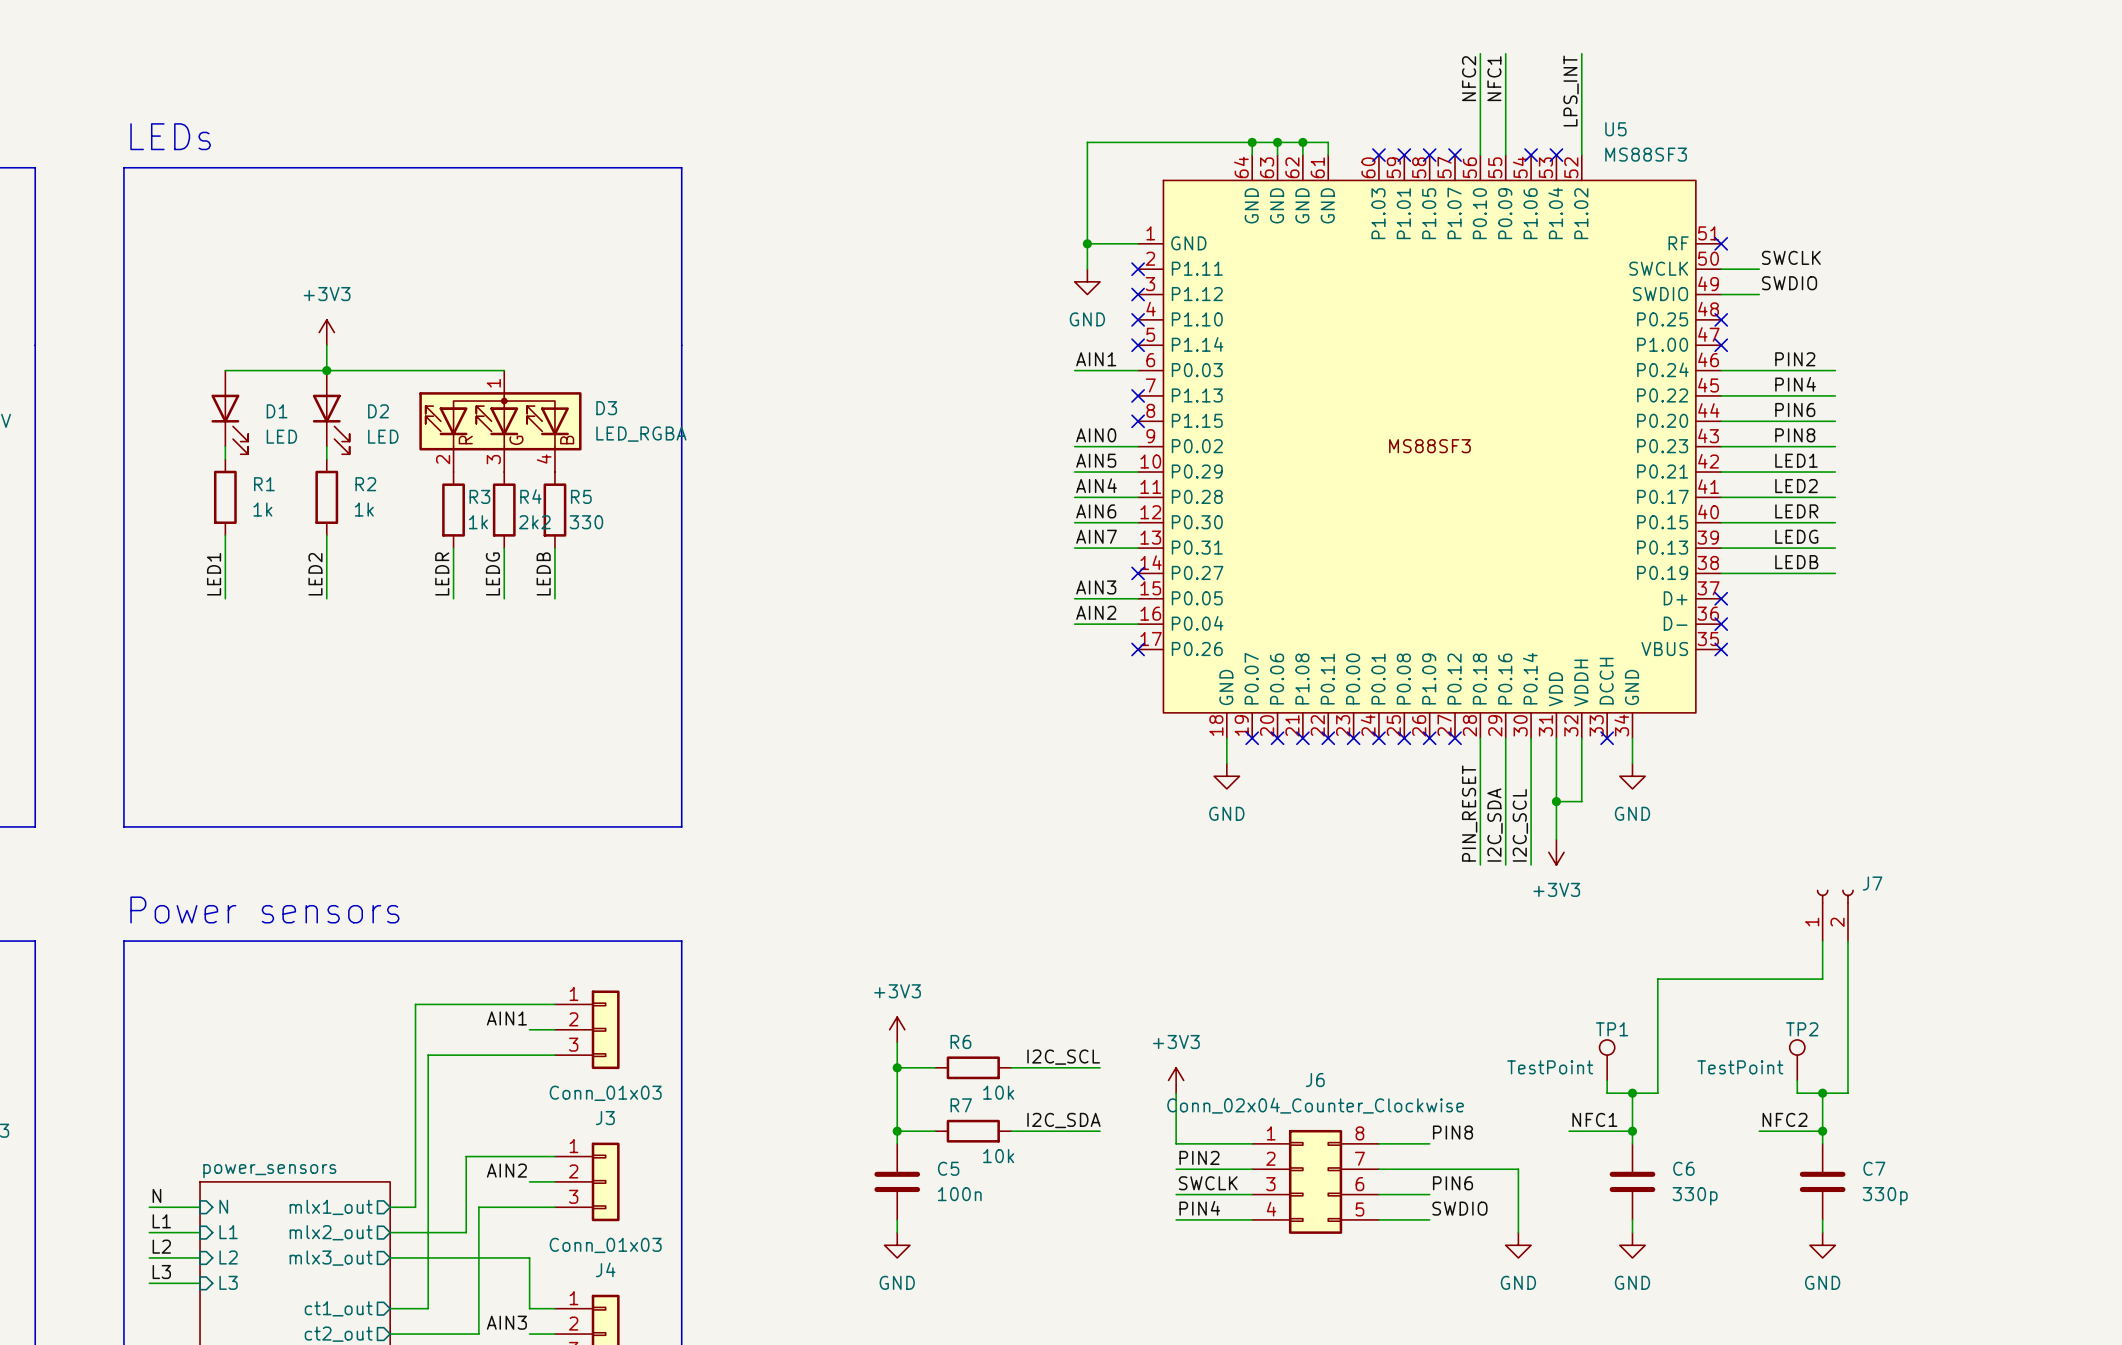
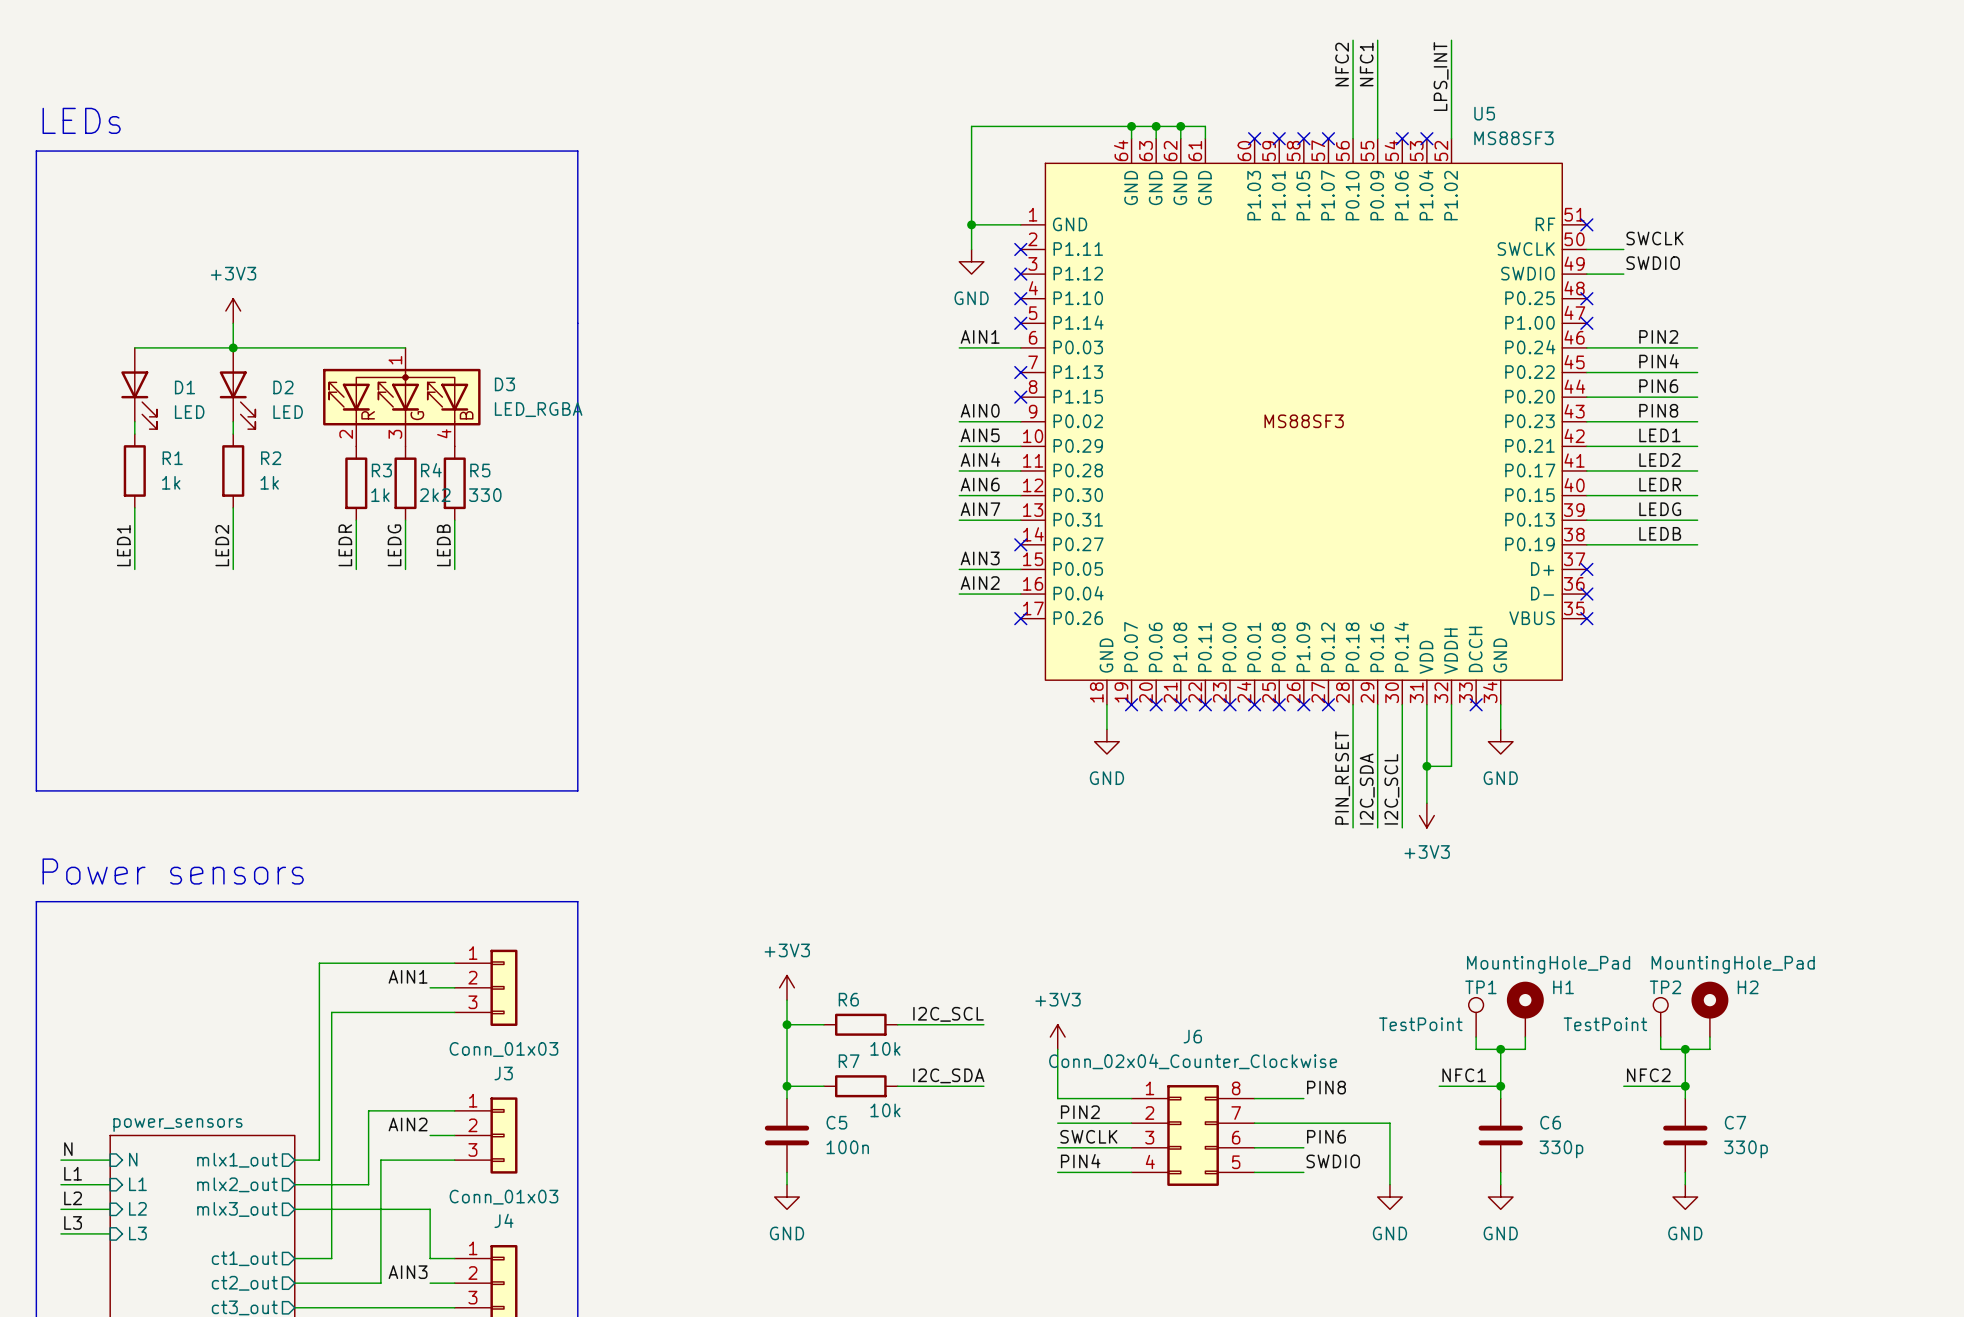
J7: (1835, 915) -> none
wire: (1822, 941) (1822, 979) (1657, 979) (1657, 1080) -> none
wire: (1847, 941) (1847, 1080) -> none
H1: none -> MountingHole_Pad (1525, 1009)
H2: none -> MountingHole_Pad (1709, 1009)

